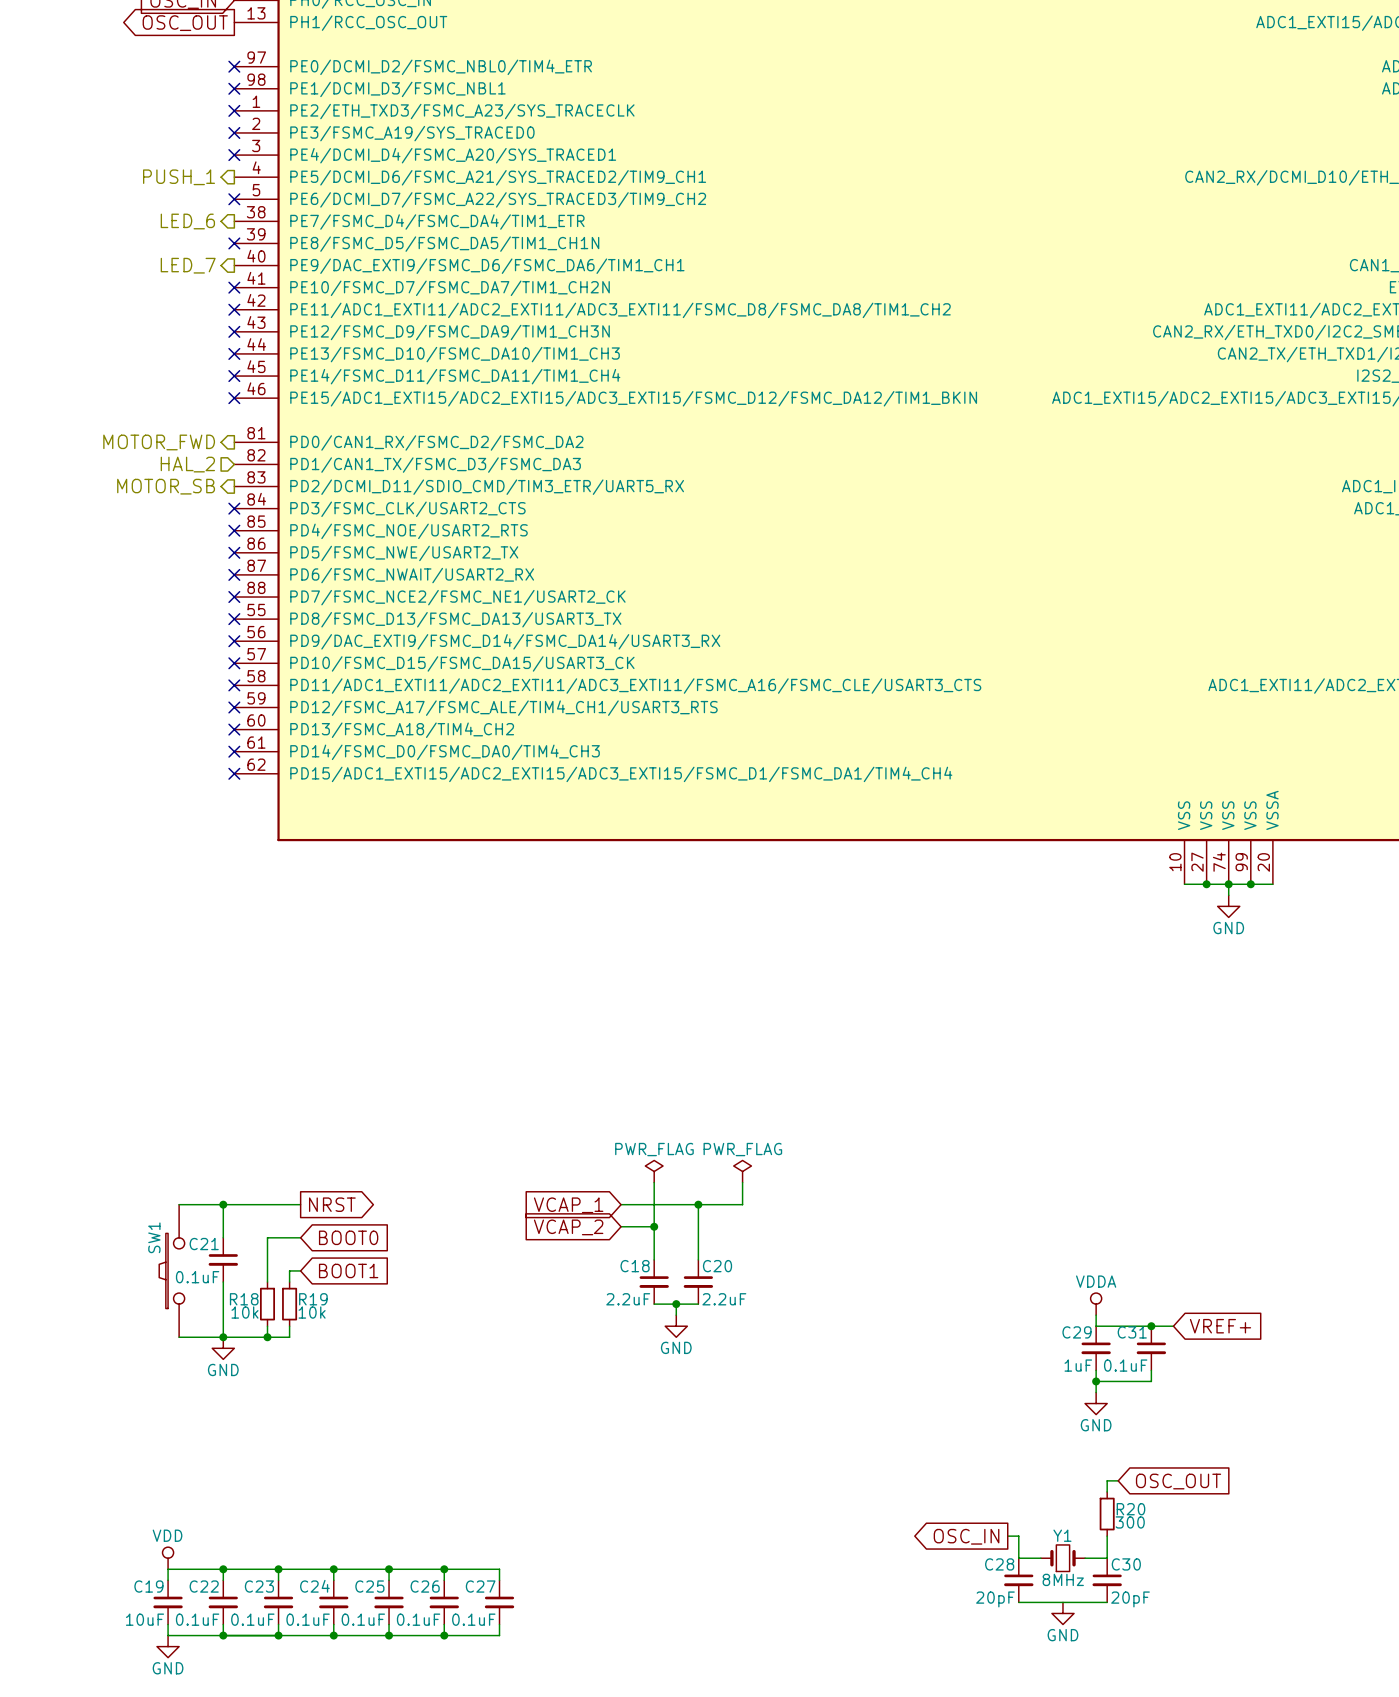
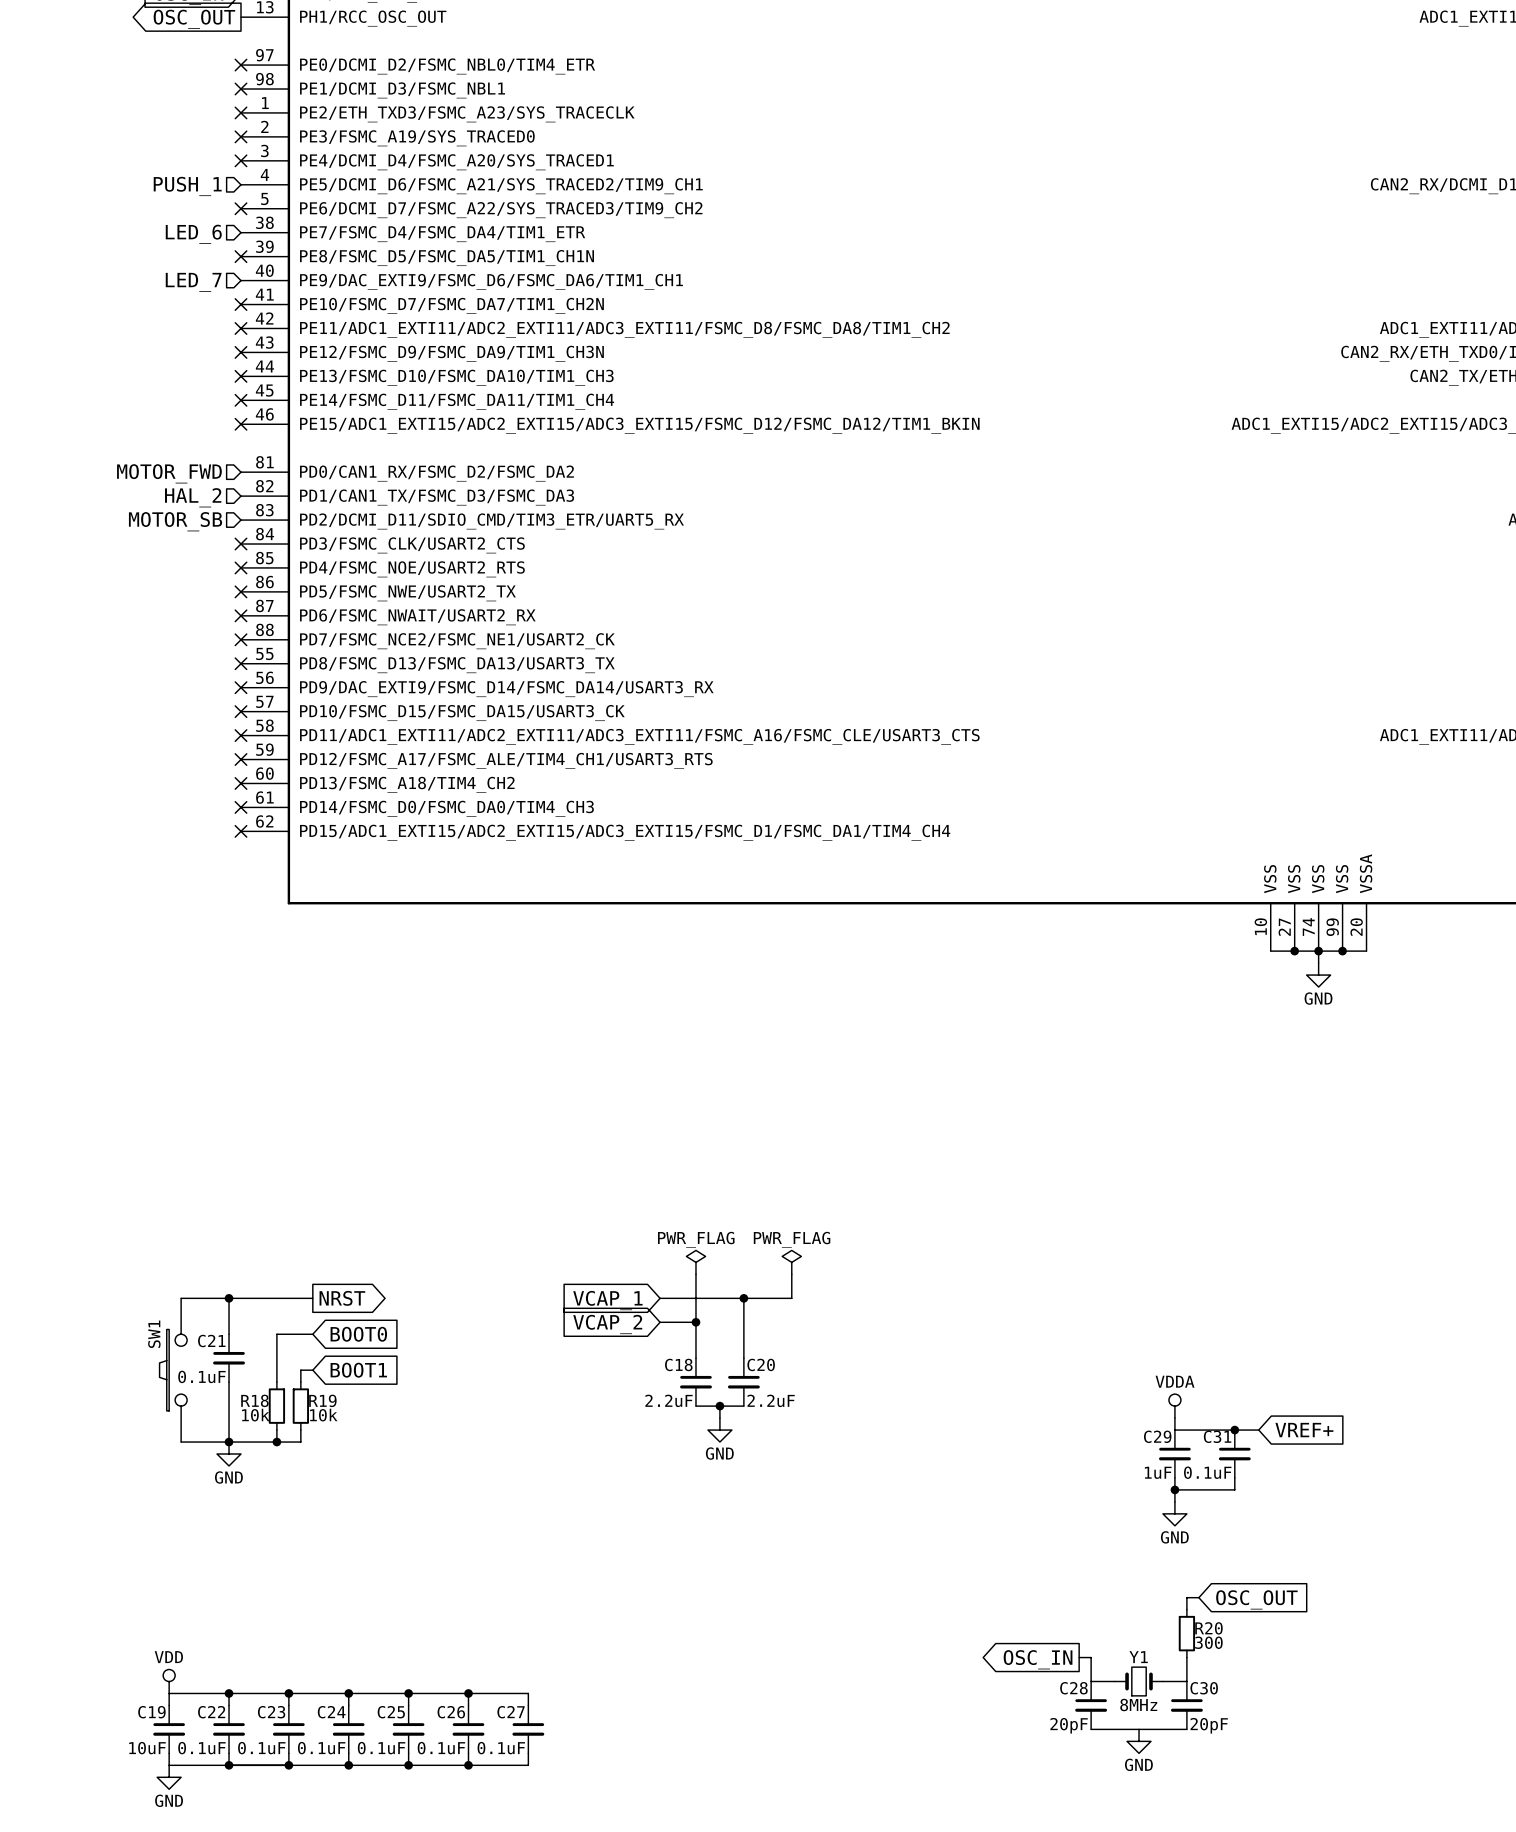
hierarchical label shape: output (179, 177) -> input (187, 186)
hierarchical label shape: output (187, 221) -> input (193, 234)
hierarchical label shape: output (188, 265) -> input (193, 282)
hierarchical label shape: output (159, 442) -> input (169, 473)
hierarchical label shape: output (166, 486) -> input (175, 521)

